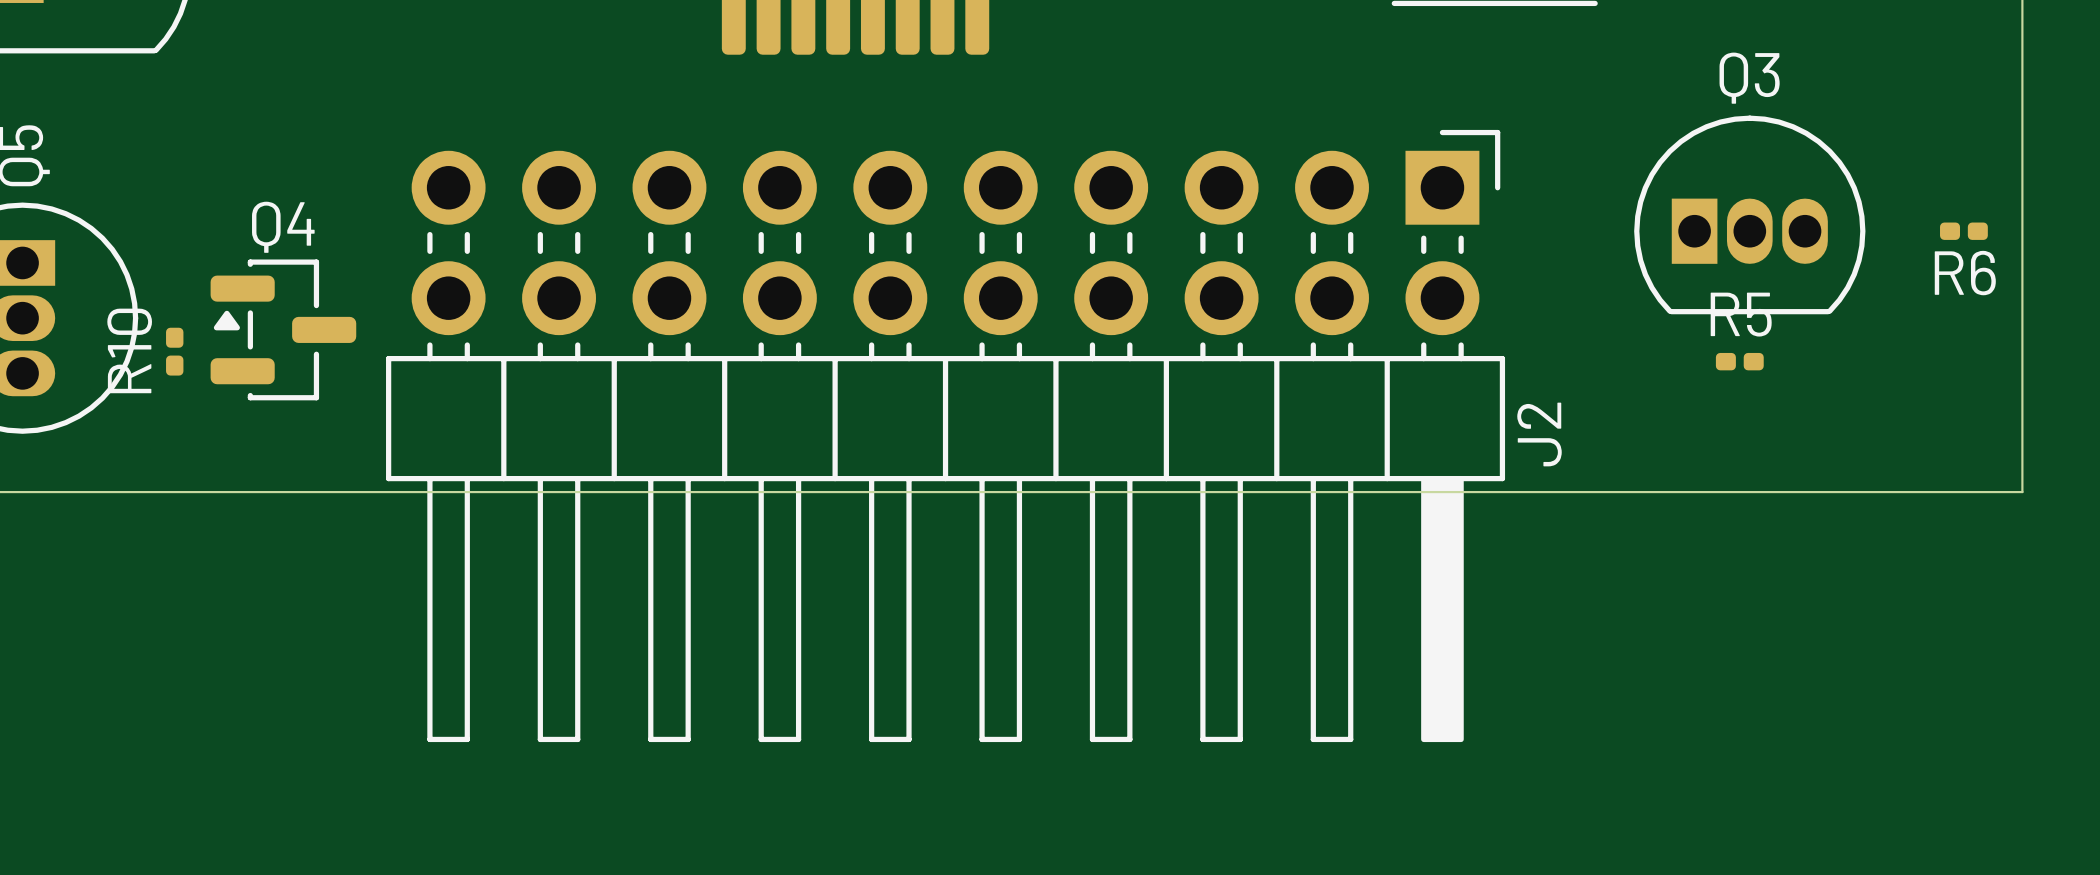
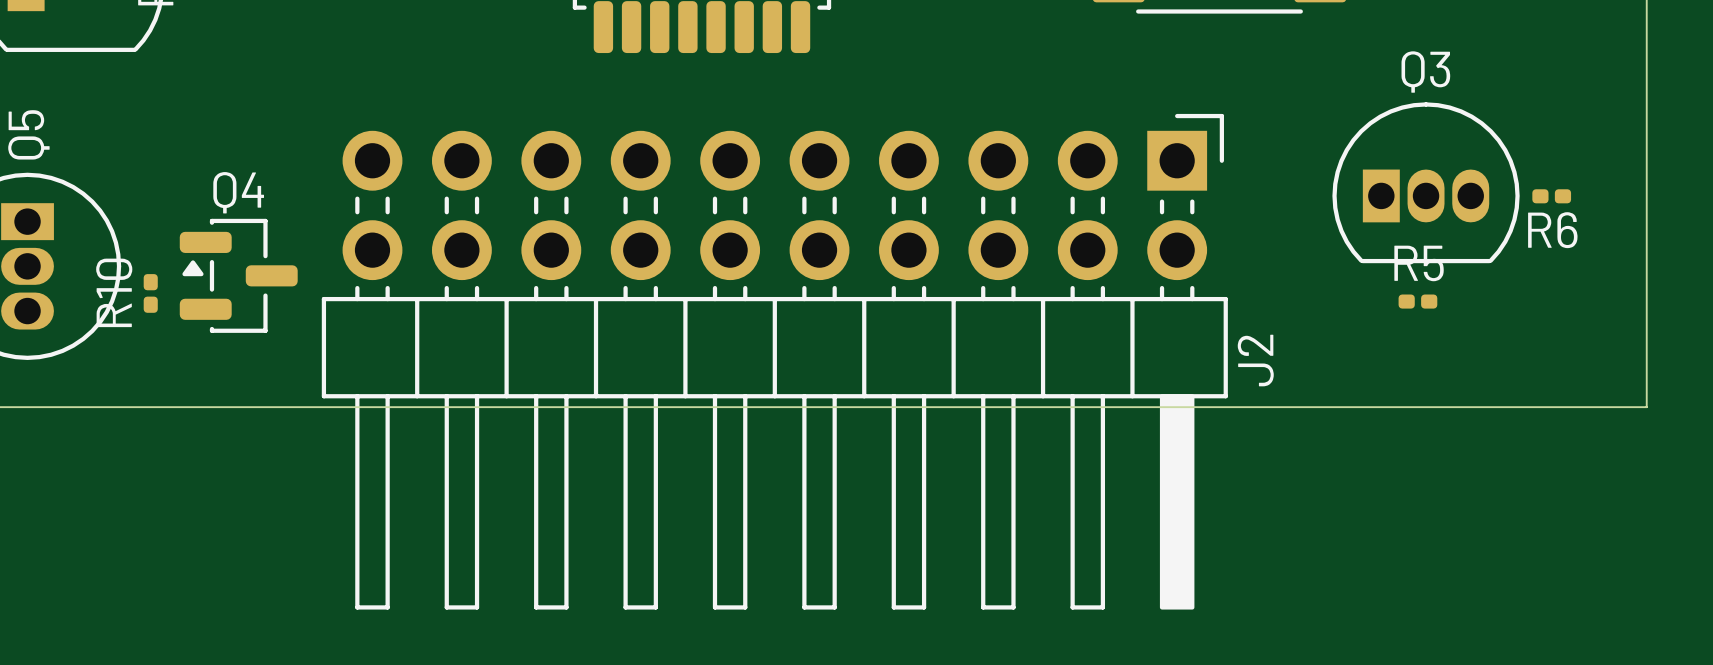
R6 position: (1963, 231) -> (1551, 196)

